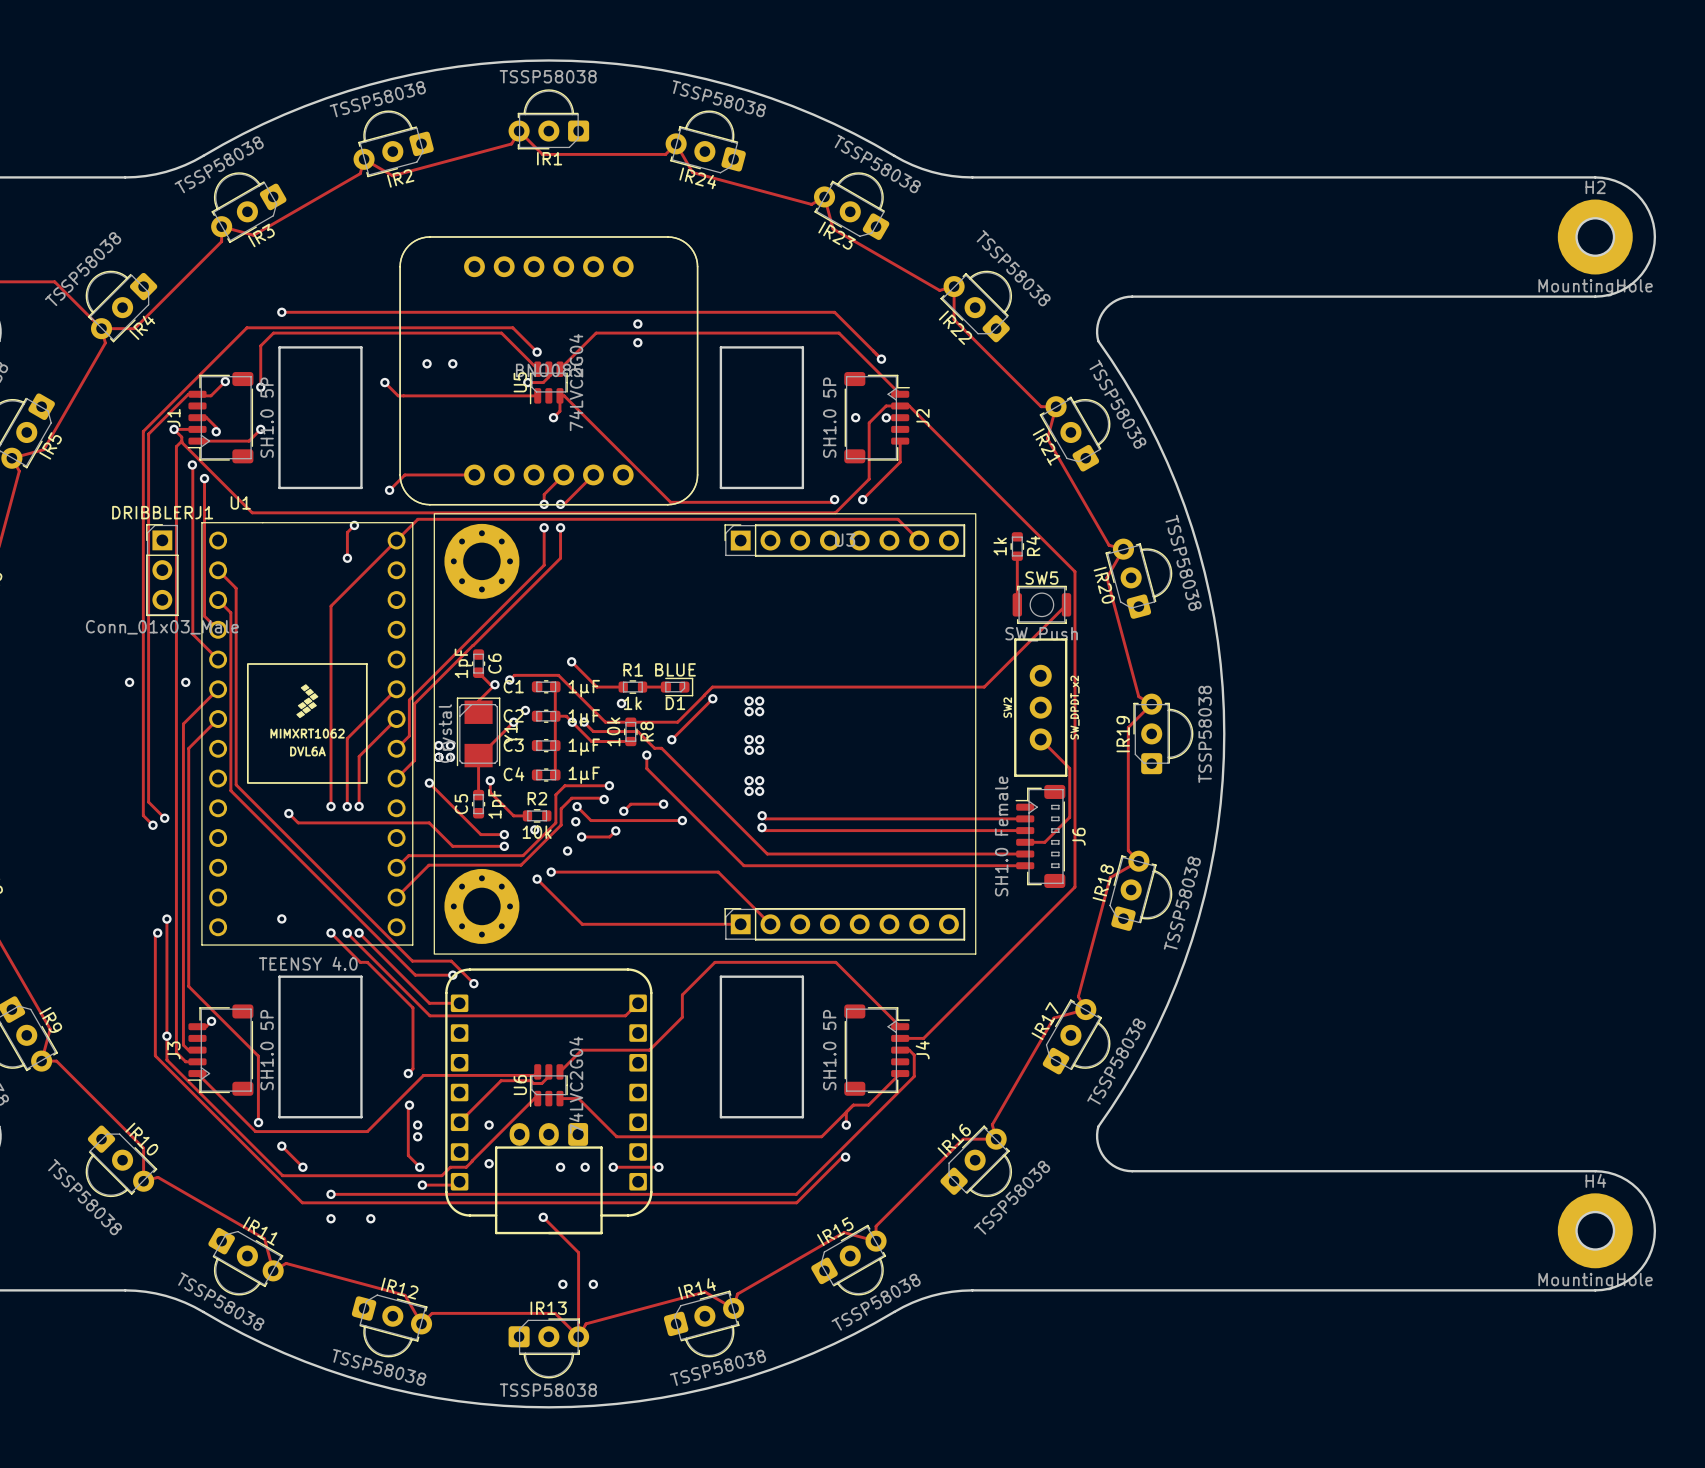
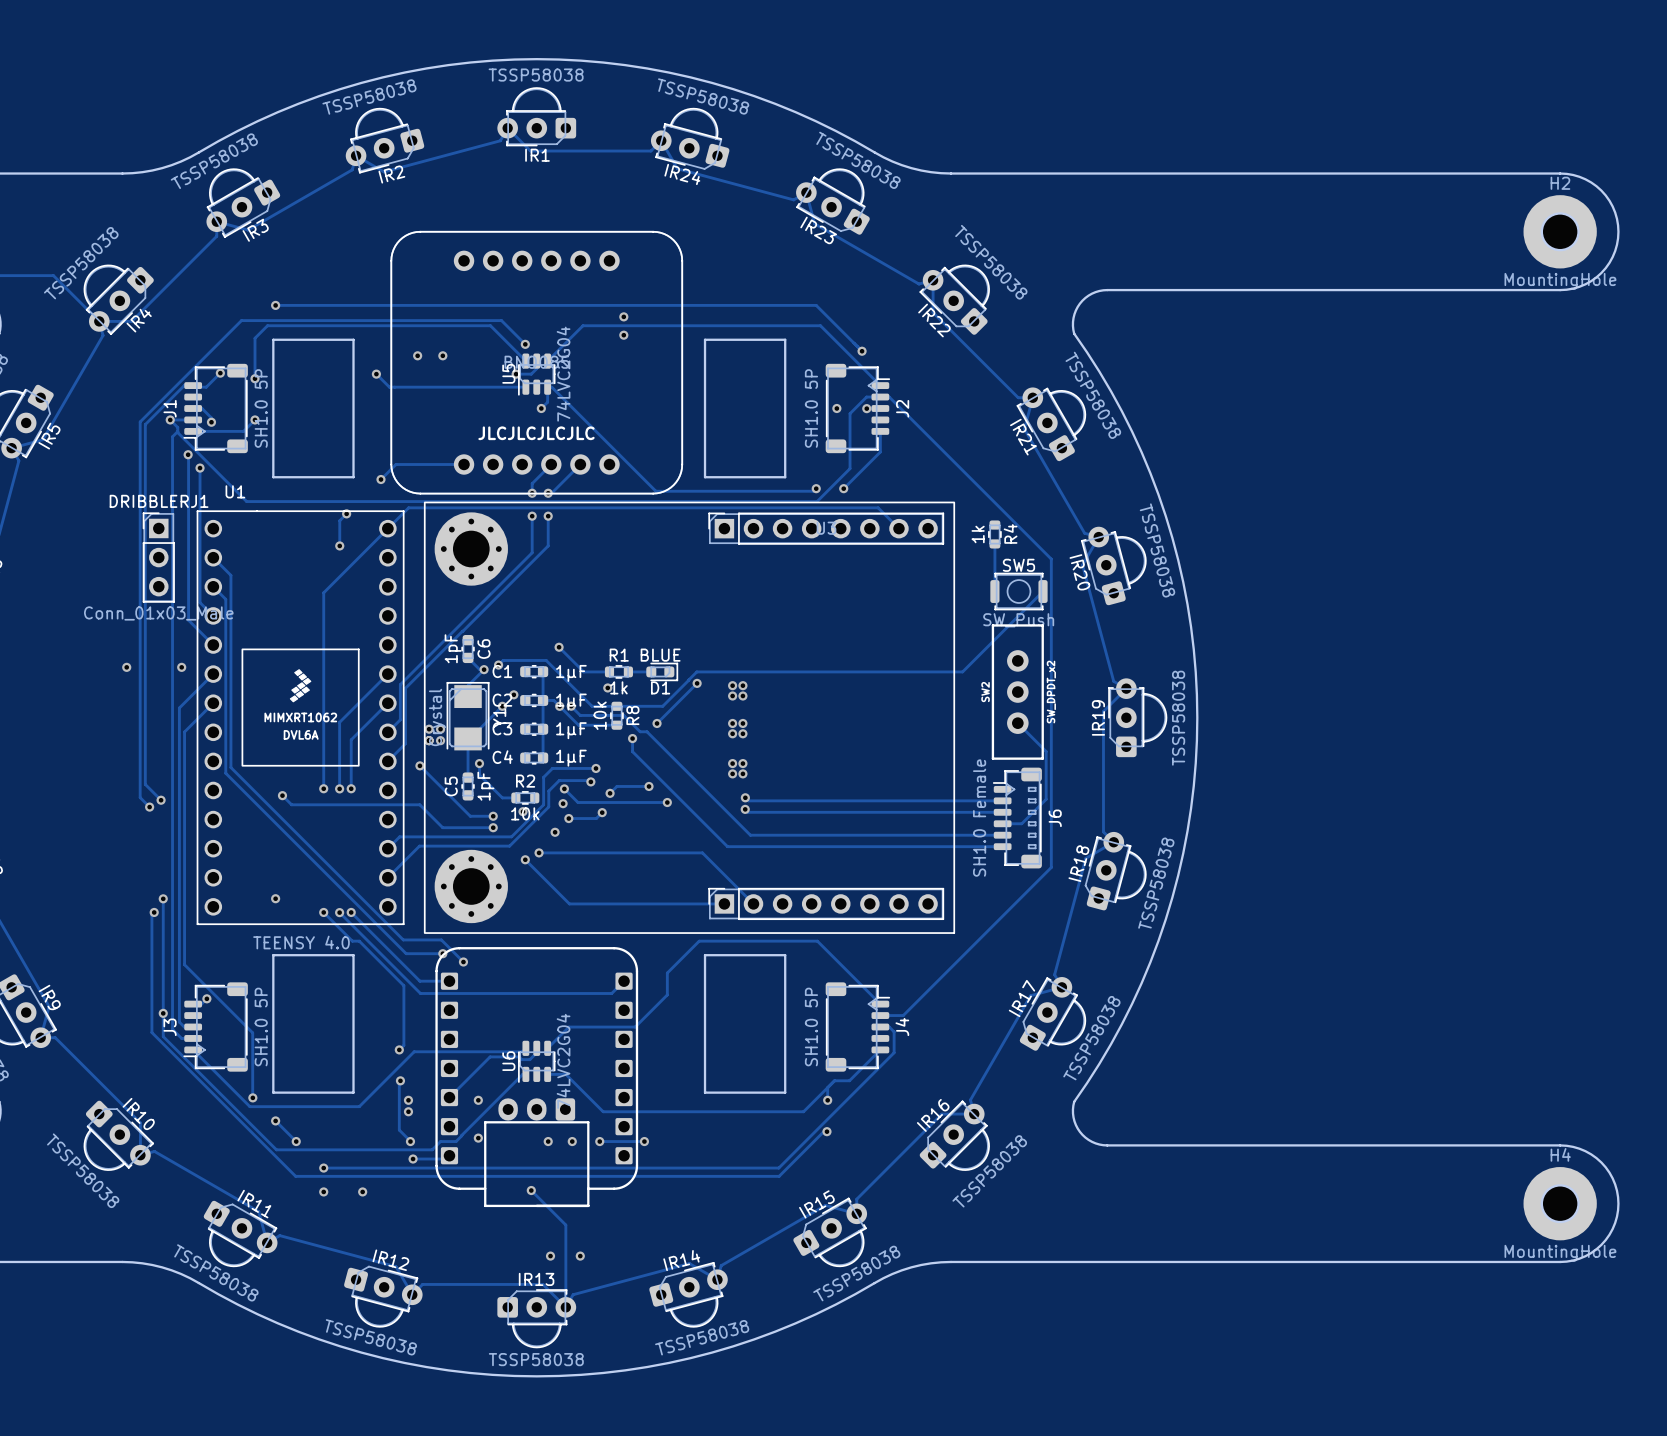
text: none -> JLCJLCJLCJLC (536, 433)

